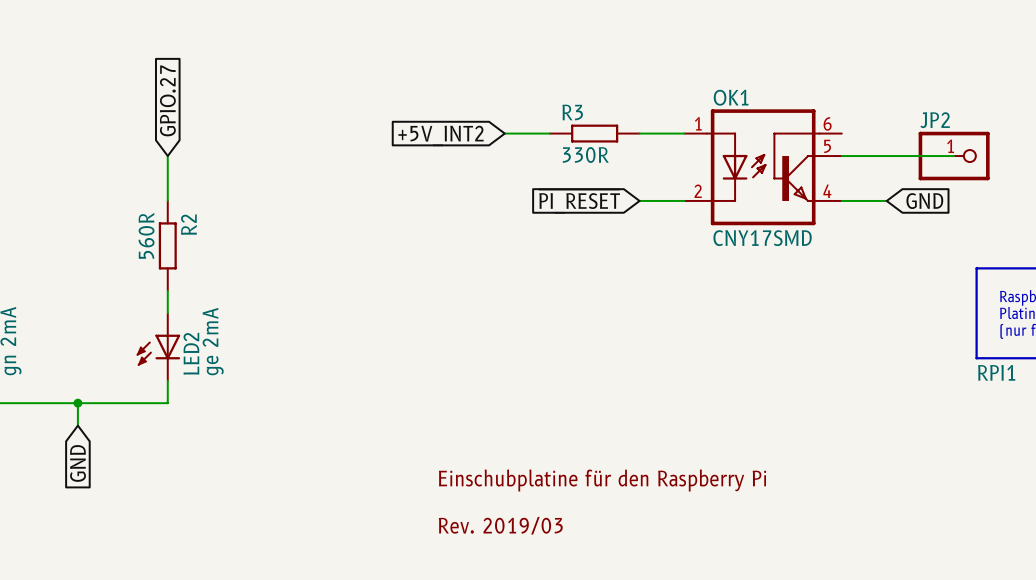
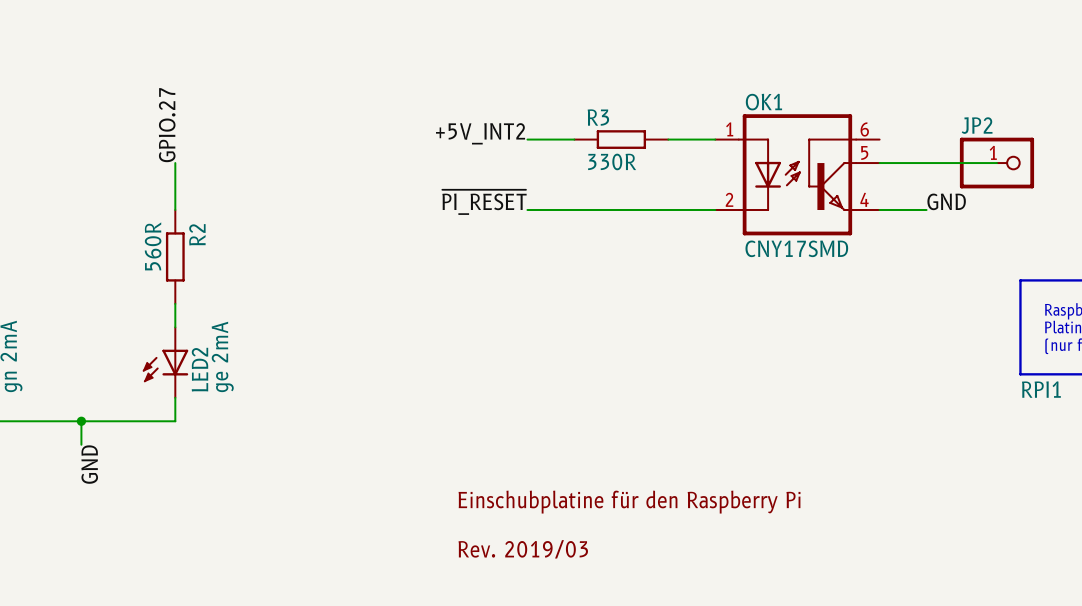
global label: GPIO.27 (167, 100) -> none
label: none -> GPIO.27 (167, 125)
label: none -> +5V_INT2 (480, 133)
global label: +5V_INT2 (441, 135) -> none
label: none -> ~{PI_RESET} (484, 202)
label: none -> GND (946, 201)
wire: none -> (527, 209) (668, 209)
global label: ~{PI_RESET} (579, 201) -> none
global label: GND (924, 201) -> none
label: none -> GND (89, 464)
global label: GND (78, 463) -> none

